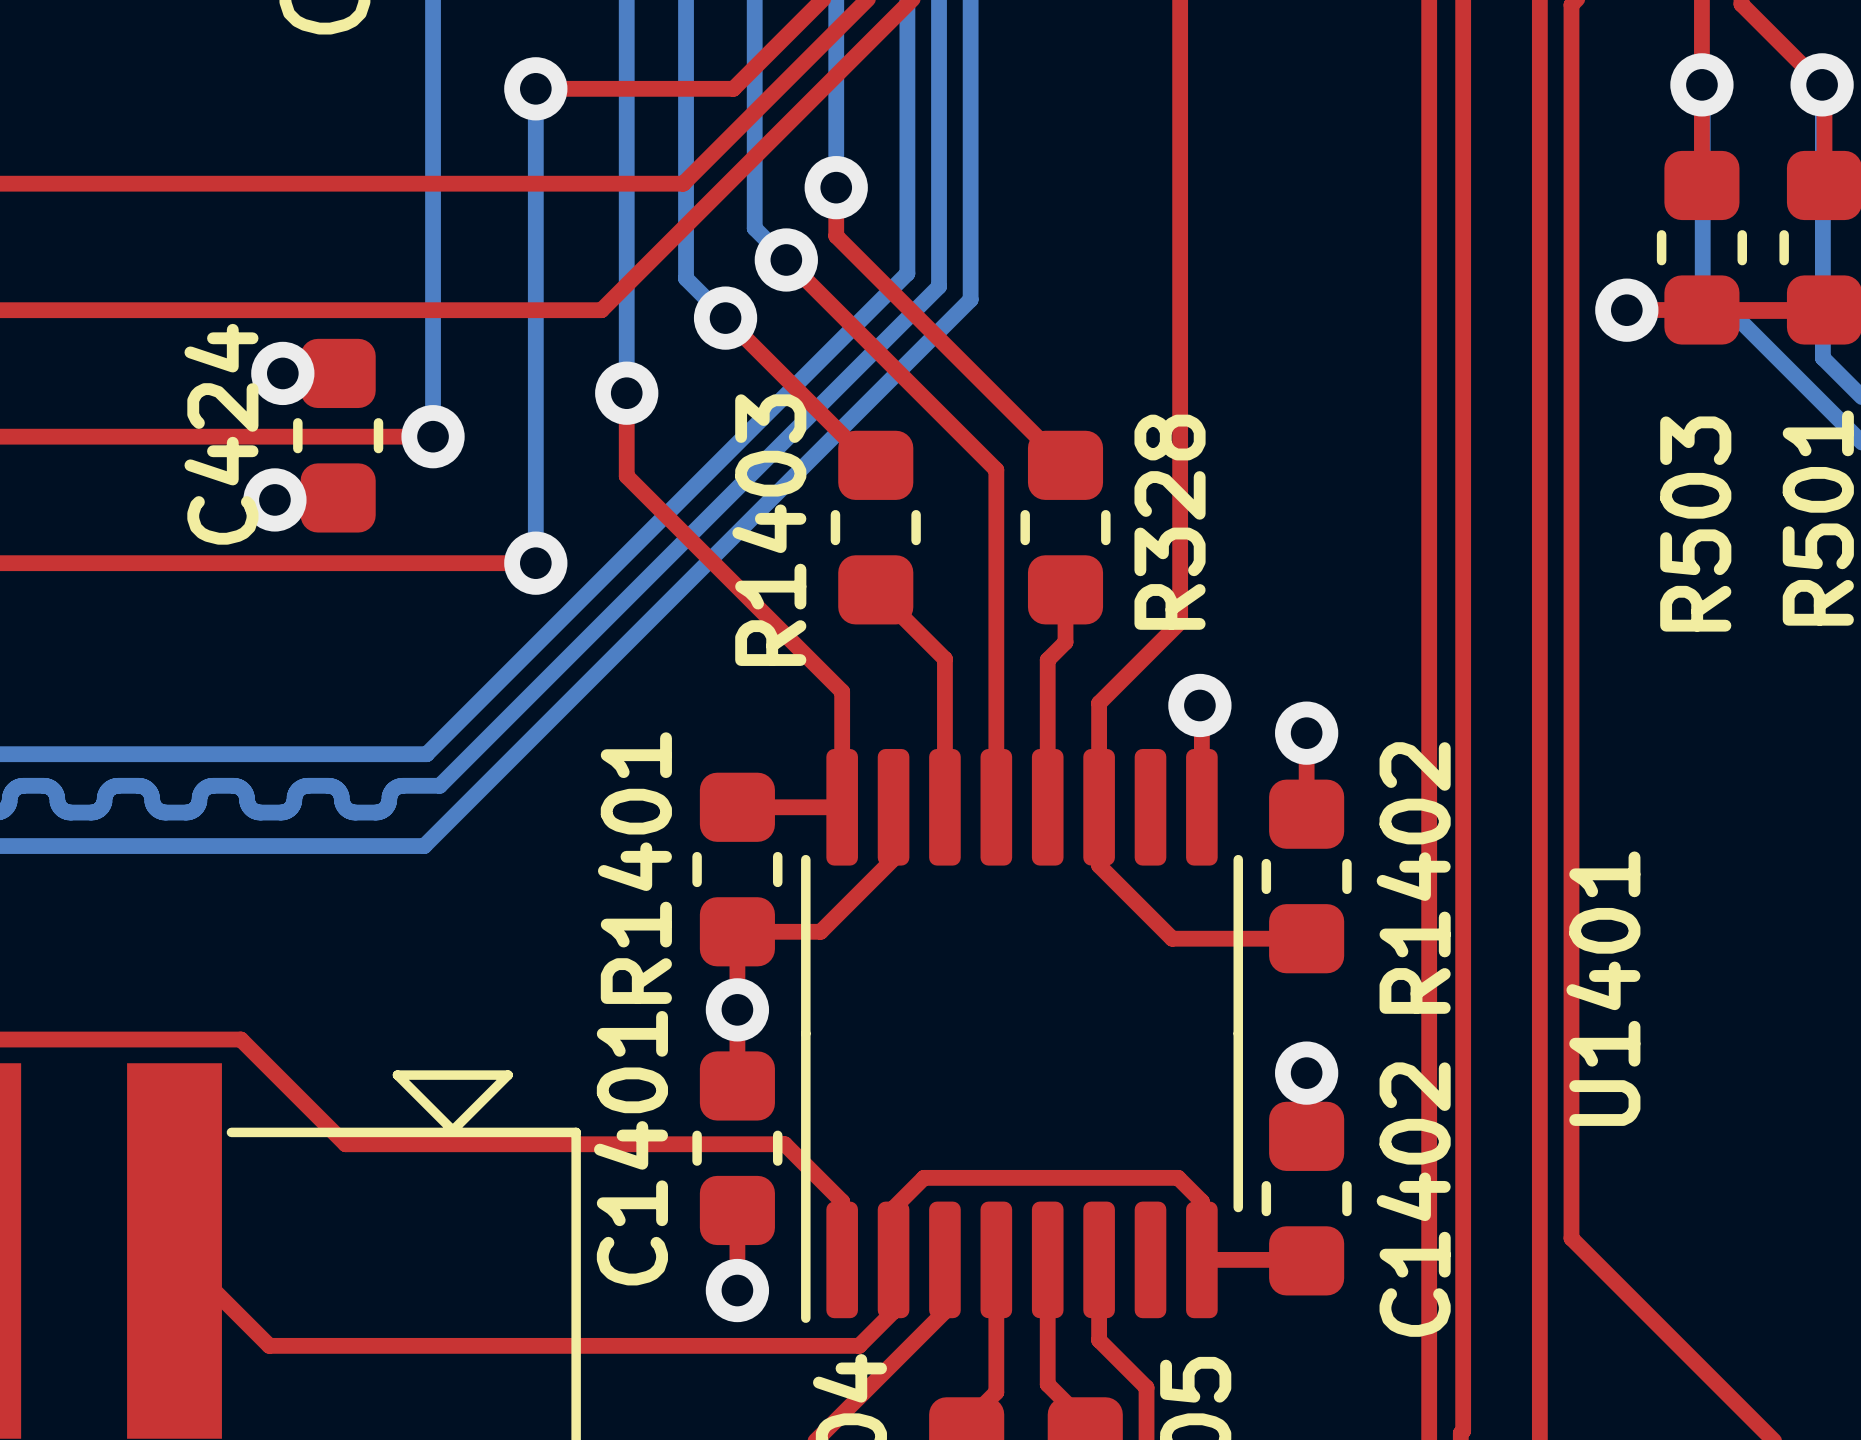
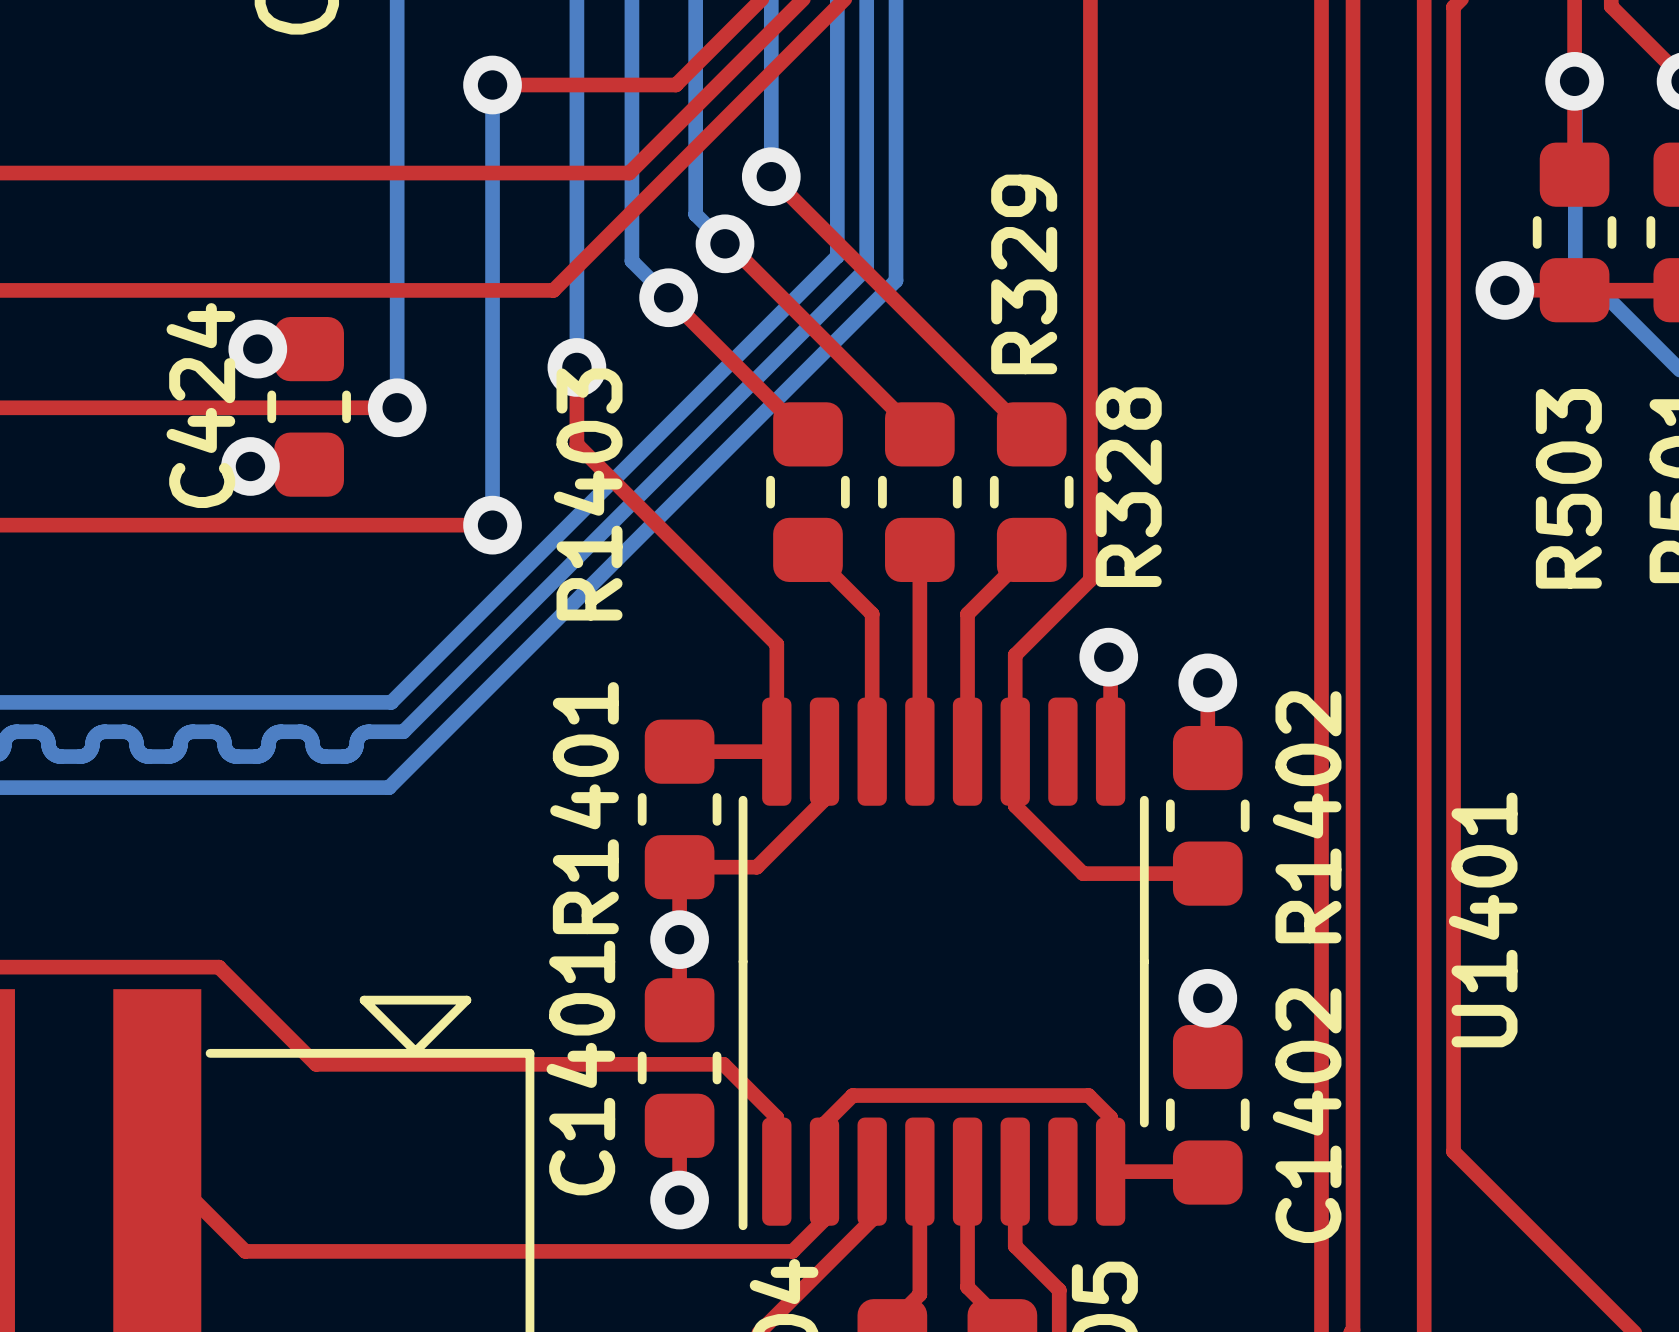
top track: (836, 187) (836, 236) (1065, 465) -> (771, 176) (1028, 434) (1031, 434)
top track: (786, 259) (996, 469) (996, 589) -> (727, 242) (918, 434)
R329: none -> (919, 492)
R328 position: (1065, 527) -> (1031, 492)
R1403 name position: R1403 (769, 530) -> R1403 (588, 494)
top track: (1065, 589) (1065, 642) (1047, 660) -> (1031, 549) (967, 614)

